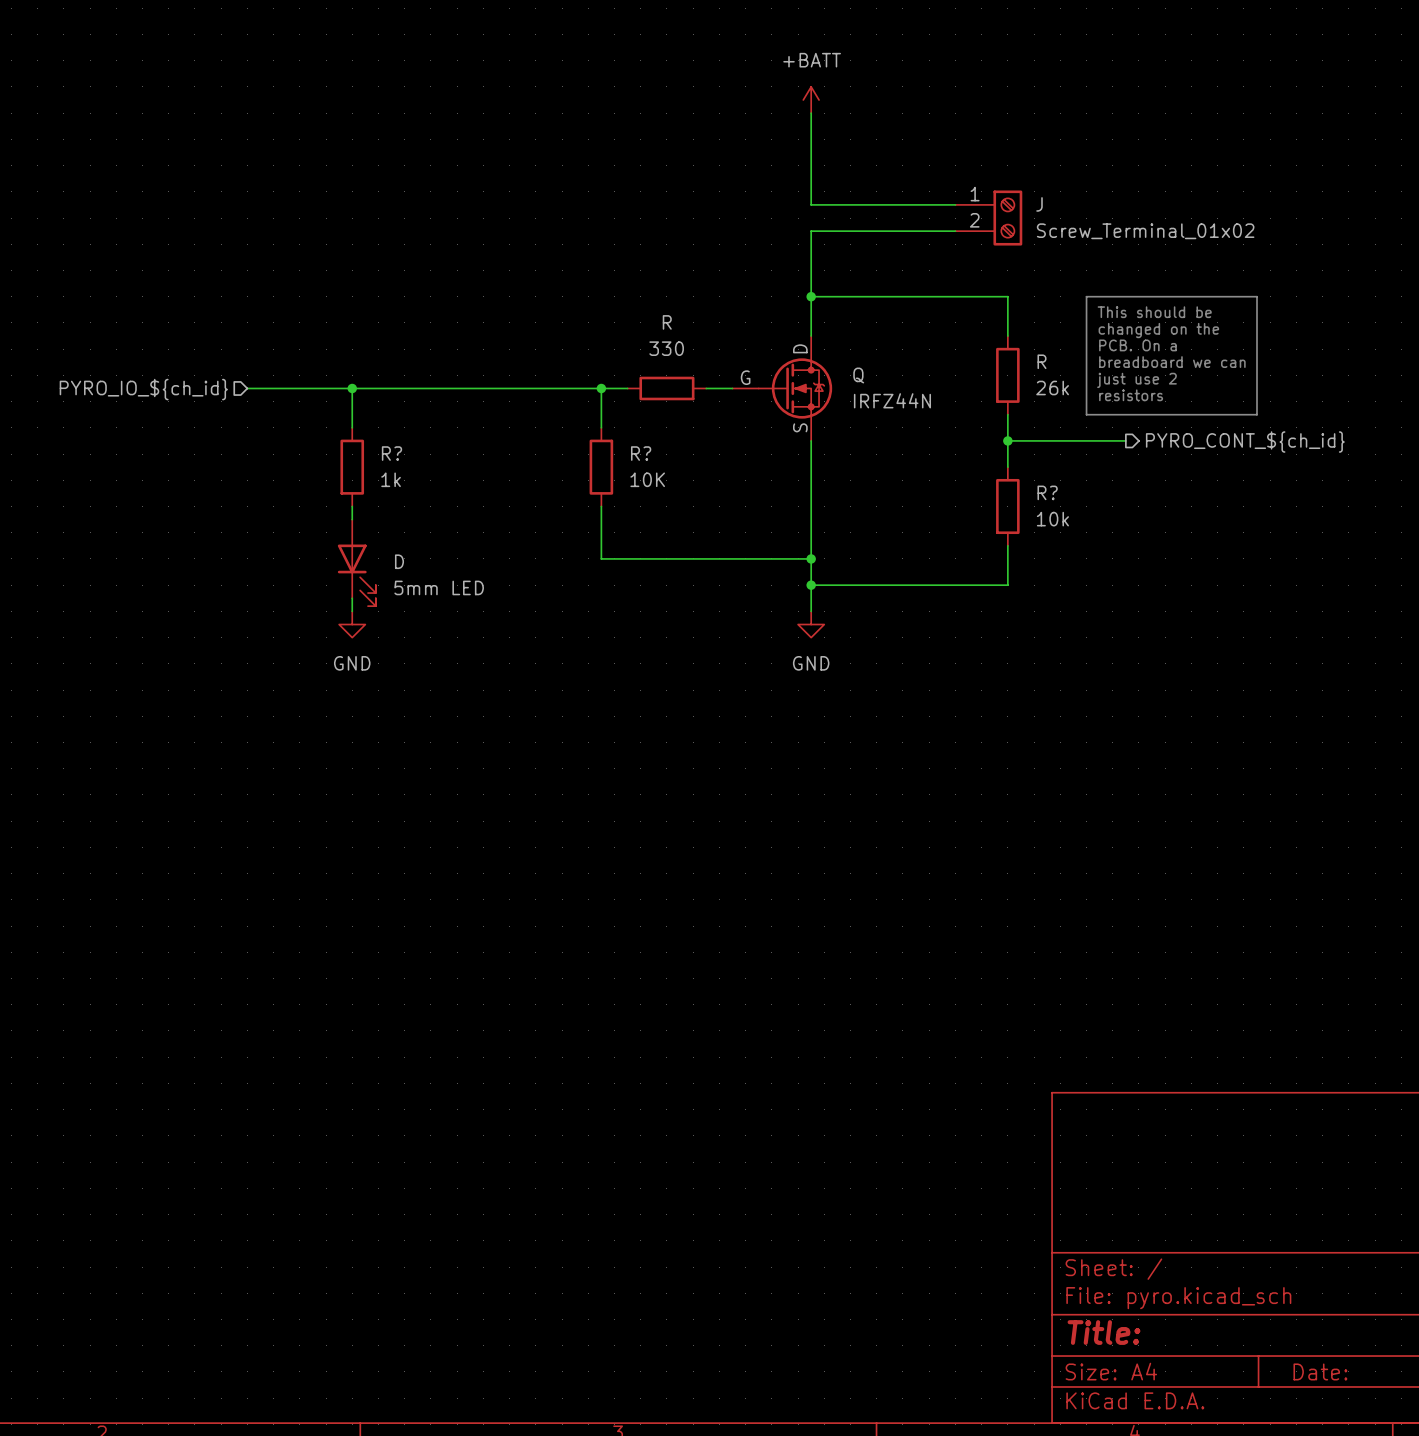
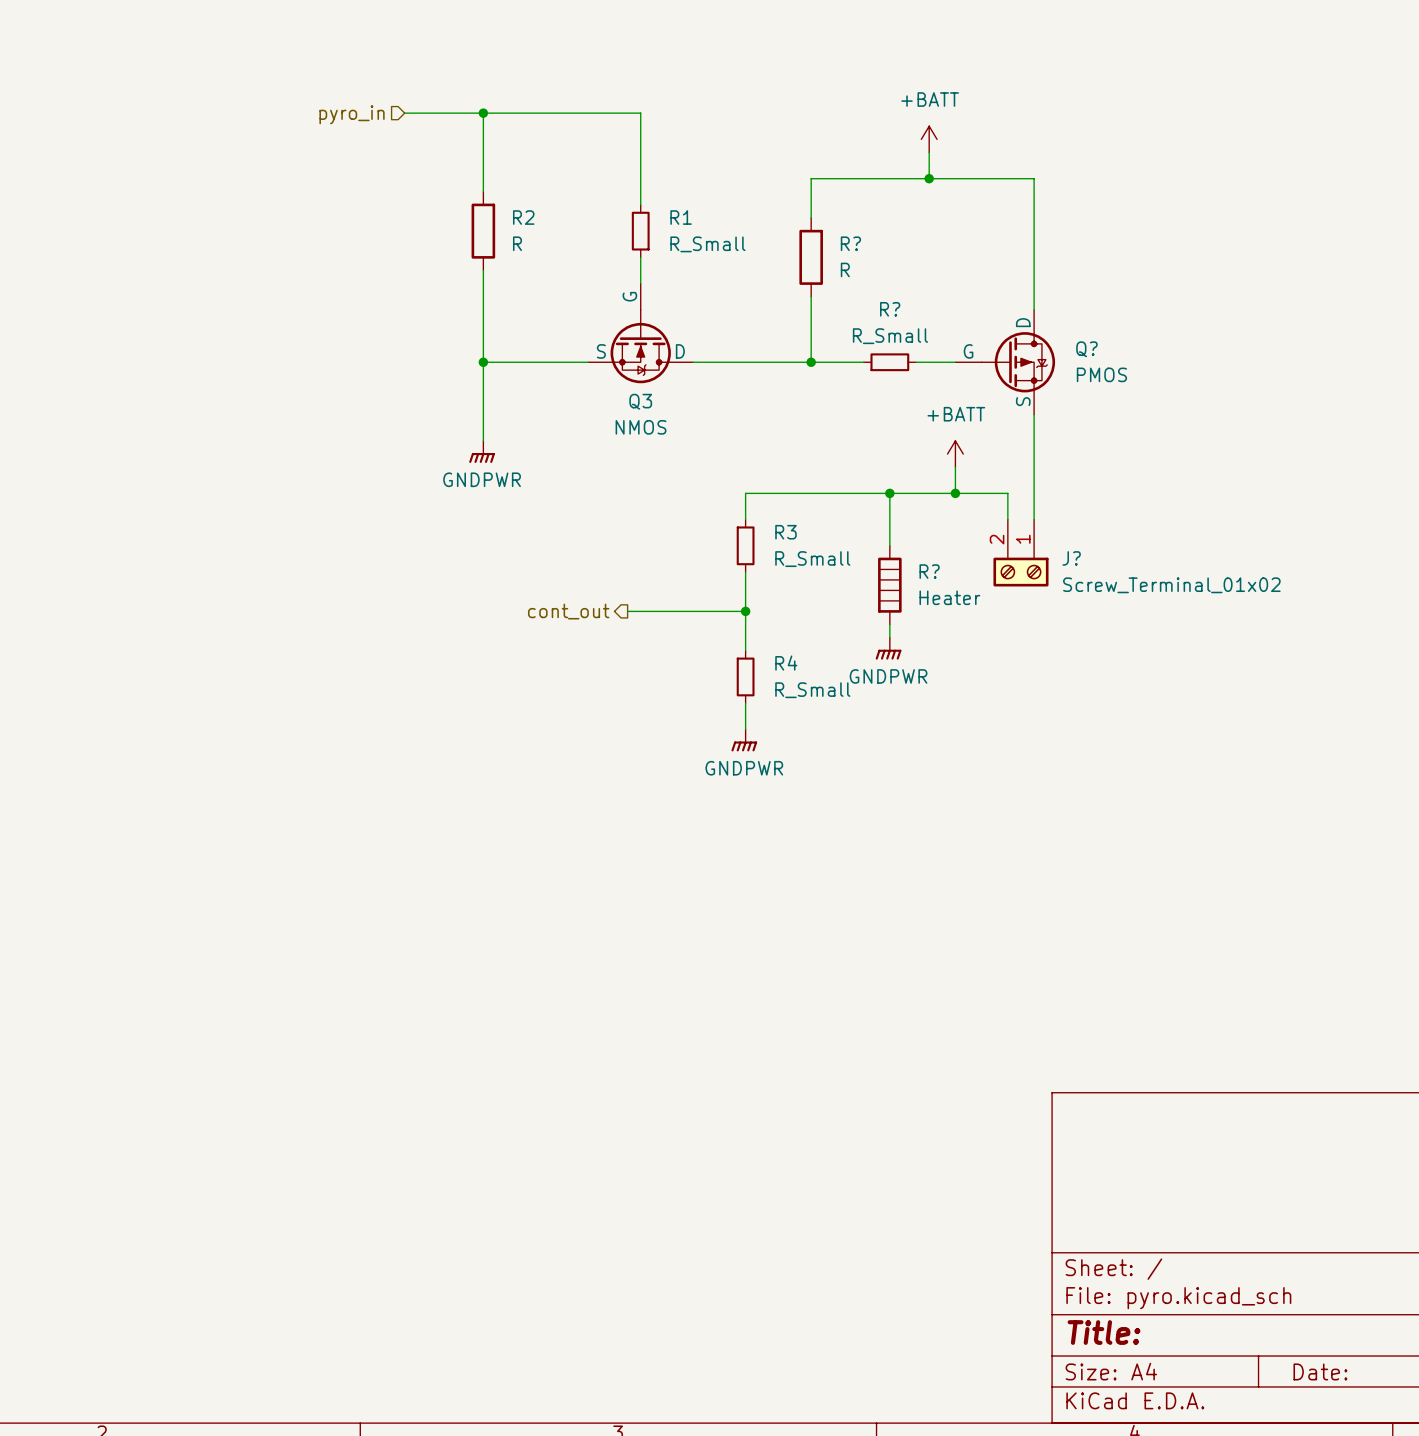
power symbol position: +BATT (811, 100) -> +BATT (929, 139)
wire: none -> (404, 113) (640, 113) (640, 204)
wire: none -> (483, 113) (483, 191)
junction: none -> (483, 113)
wire: (811, 113) (811, 178) -> (1034, 309) (1034, 178) (811, 178)
hierarchical label: none -> pyro_in (352, 114)
wire: none -> (929, 152) (929, 178)
junction: none -> (929, 178)
wire: (811, 204) (955, 204) -> (811, 204) (811, 218)
J: Screw_Terminal_01x02 (988, 218) -> none
R2: none -> R (483, 231)
R1: none -> R_Small (640, 231)
wire: (955, 231) (811, 231) (811, 296) (1007, 296) (1007, 336) -> none
wire: none -> (640, 257) (640, 283)
R?: none -> R (811, 257)
wire: none -> (483, 270) (483, 440)
junction: (811, 296) -> none
line: (1086, 296) (1257, 296) (1257, 414) (1086, 414) (1086, 296) -> none
text: This should be (1154, 312) -> none
text: changed on the (1158, 330) -> none
Q3: none -> NMOS (640, 333)
text: PCB. On a (1137, 345) -> none
wire: none -> (483, 362) (588, 362)
junction: none -> (483, 362)
wire: none -> (693, 362) (863, 362)
junction: none -> (811, 362)
R?: none -> R_Small (889, 362)
wire: none -> (916, 362) (955, 362)
Q?: none -> PMOS (1005, 362)
text: breadboard we can (1172, 362) -> none
R: 26k (1007, 375) -> none
text: just use 2 (1136, 380) -> none
wire: (247, 388) (627, 388) -> none
wire: (352, 388) (352, 427) -> none
junction: (352, 388) -> none
wire: (601, 388) (601, 427) -> none
junction: (601, 388) -> none
R: 330 (666, 388) -> none
wire: (706, 388) (732, 388) -> none
Q: IRFZ44N (782, 388) -> none
hierarchical label: PYRO_IO_${ch_id} (143, 389) -> none
text: resistors (1131, 395) -> none
wire: (1007, 414) (1007, 467) -> (889, 493) (889, 545)
wire: none -> (1034, 414) (1034, 519)
wire: (811, 440) (811, 611) -> none
wire: (1007, 440) (1125, 440) -> none
junction: (1007, 440) -> none
hierarchical label: PYRO_CONT_${ch_id} (1245, 442) -> none
power symbol: none -> GNDPWR (482, 451)
power symbol: none -> +BATT (955, 454)
R?: 1k (352, 467) -> none
R?: 10K (601, 467) -> none
wire: none -> (955, 467) (955, 493)
junction: none -> (889, 493)
junction: none -> (955, 493)
wire: (352, 506) (352, 519) -> none
wire: (601, 506) (601, 558) (811, 558) -> none
R?: 10k (1007, 506) -> none
wire: none -> (745, 519) (745, 493) (1007, 493) (1007, 519)
R3: none -> R_Small (745, 545)
wire: (1007, 545) (1007, 585) (811, 585) -> none
J?: none -> Screw_Terminal_01x02 (1020, 553)
junction: (811, 558) -> none
D: 5mm LED (356, 562) -> none
wire: none -> (745, 572) (745, 650)
junction: (811, 585) -> none
R?: none -> Heater (889, 585)
wire: (352, 598) (352, 611) -> none
hierarchical label: none -> cont_out (568, 611)
wire: none -> (627, 611) (745, 611)
junction: none -> (745, 611)
power symbol: GND (352, 624) -> none
power symbol: GND (811, 624) -> none
wire: none -> (889, 624) (889, 637)
power symbol: none -> GNDPWR (888, 648)
R4: none -> R_Small (745, 676)
wire: none -> (745, 703) (745, 729)
power symbol: none -> GNDPWR (744, 740)

